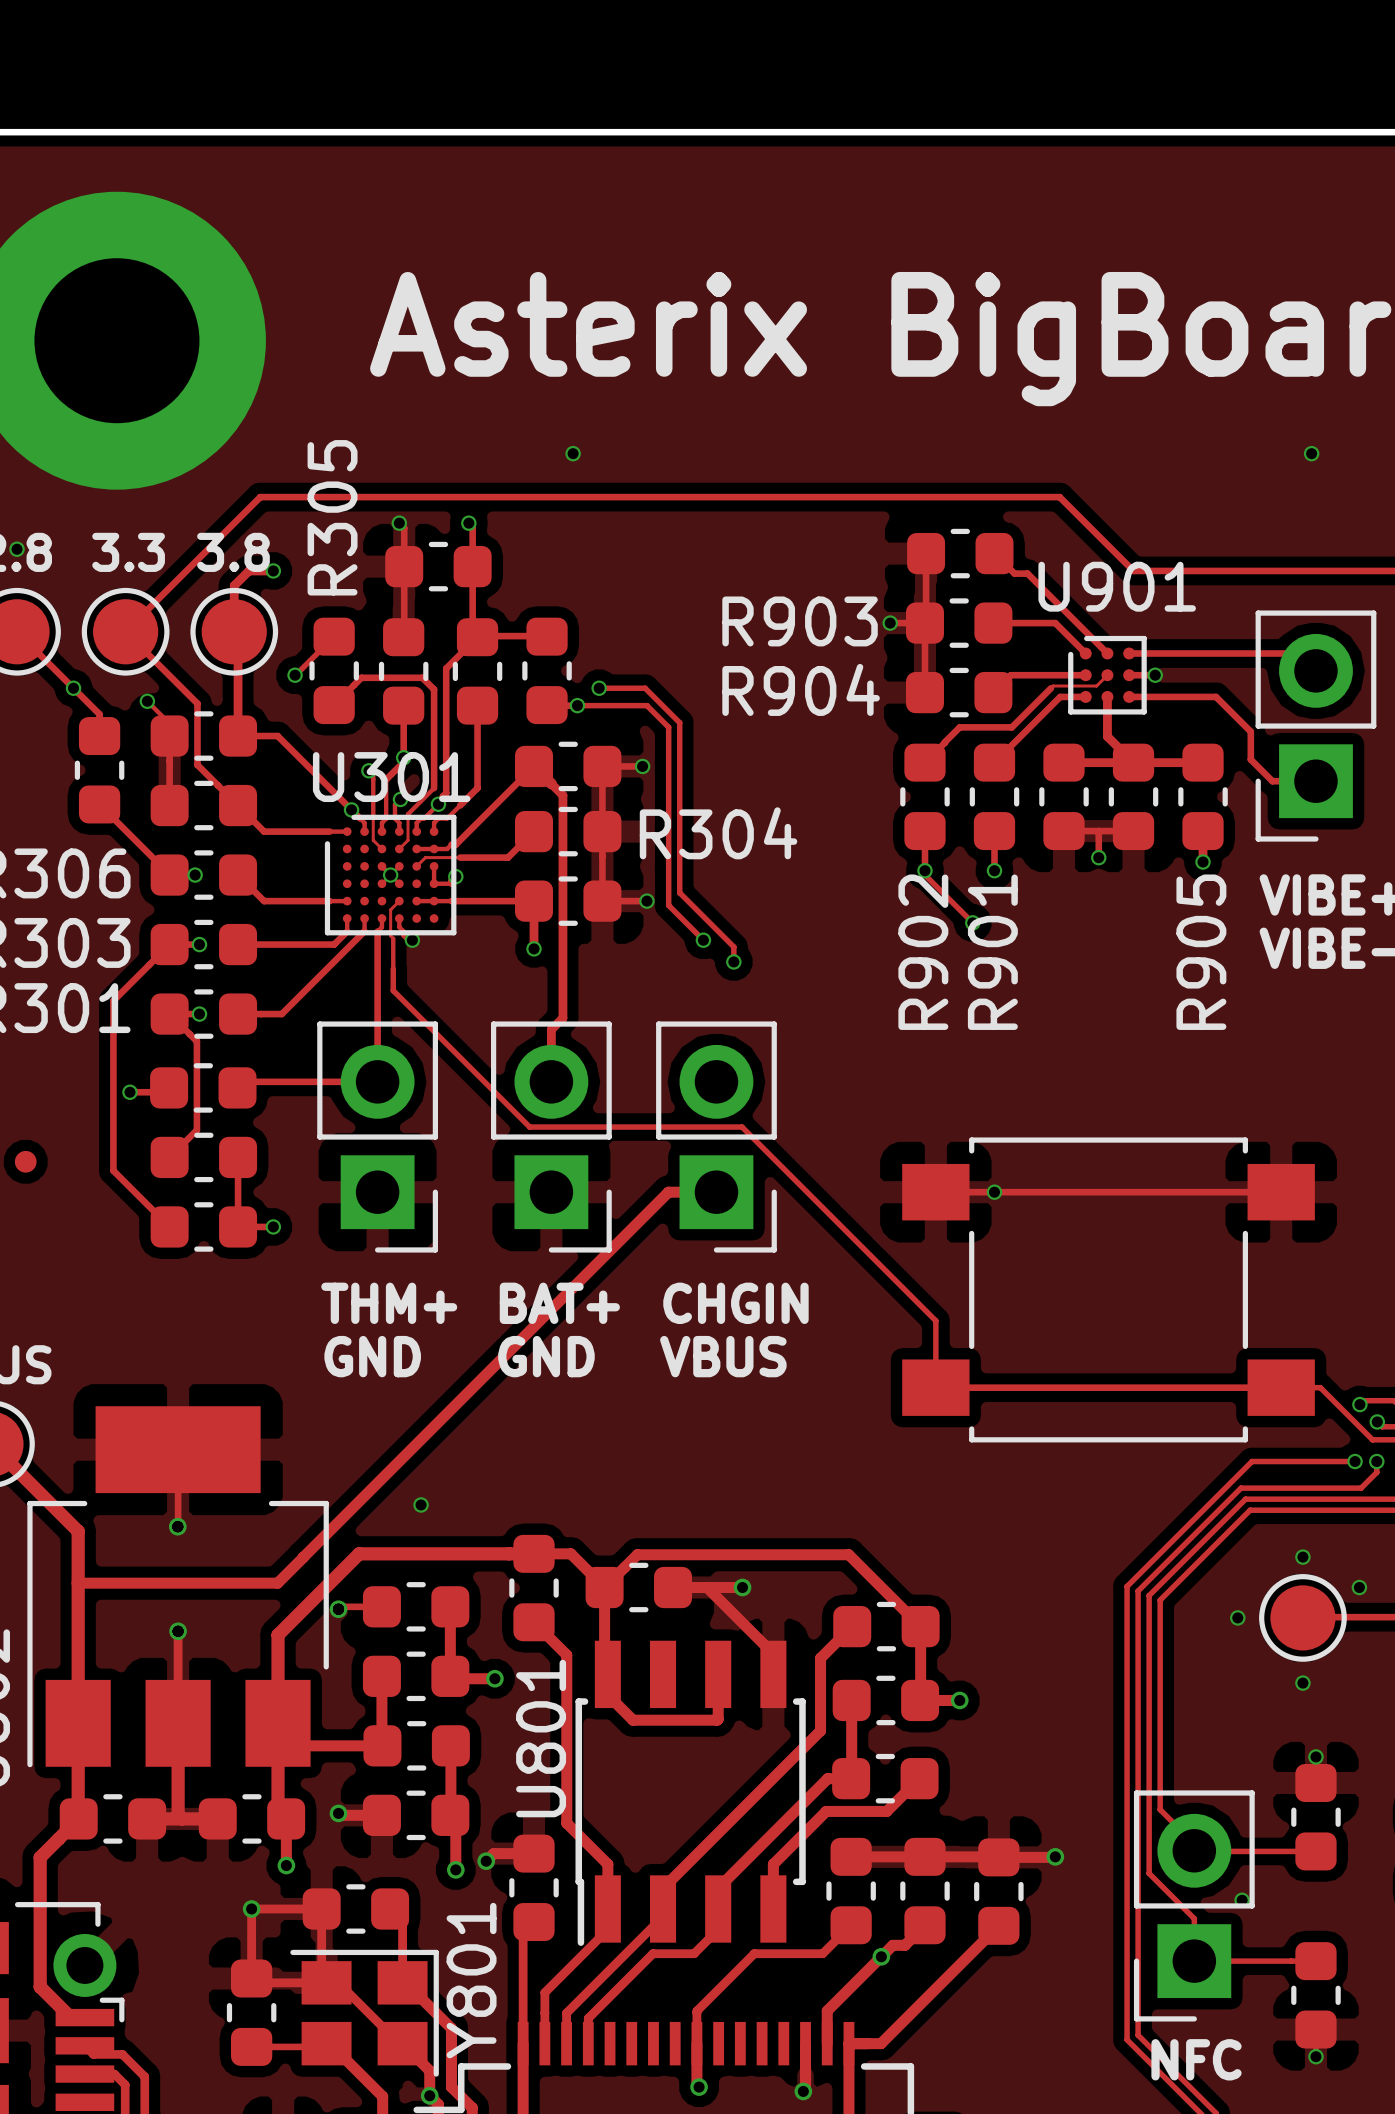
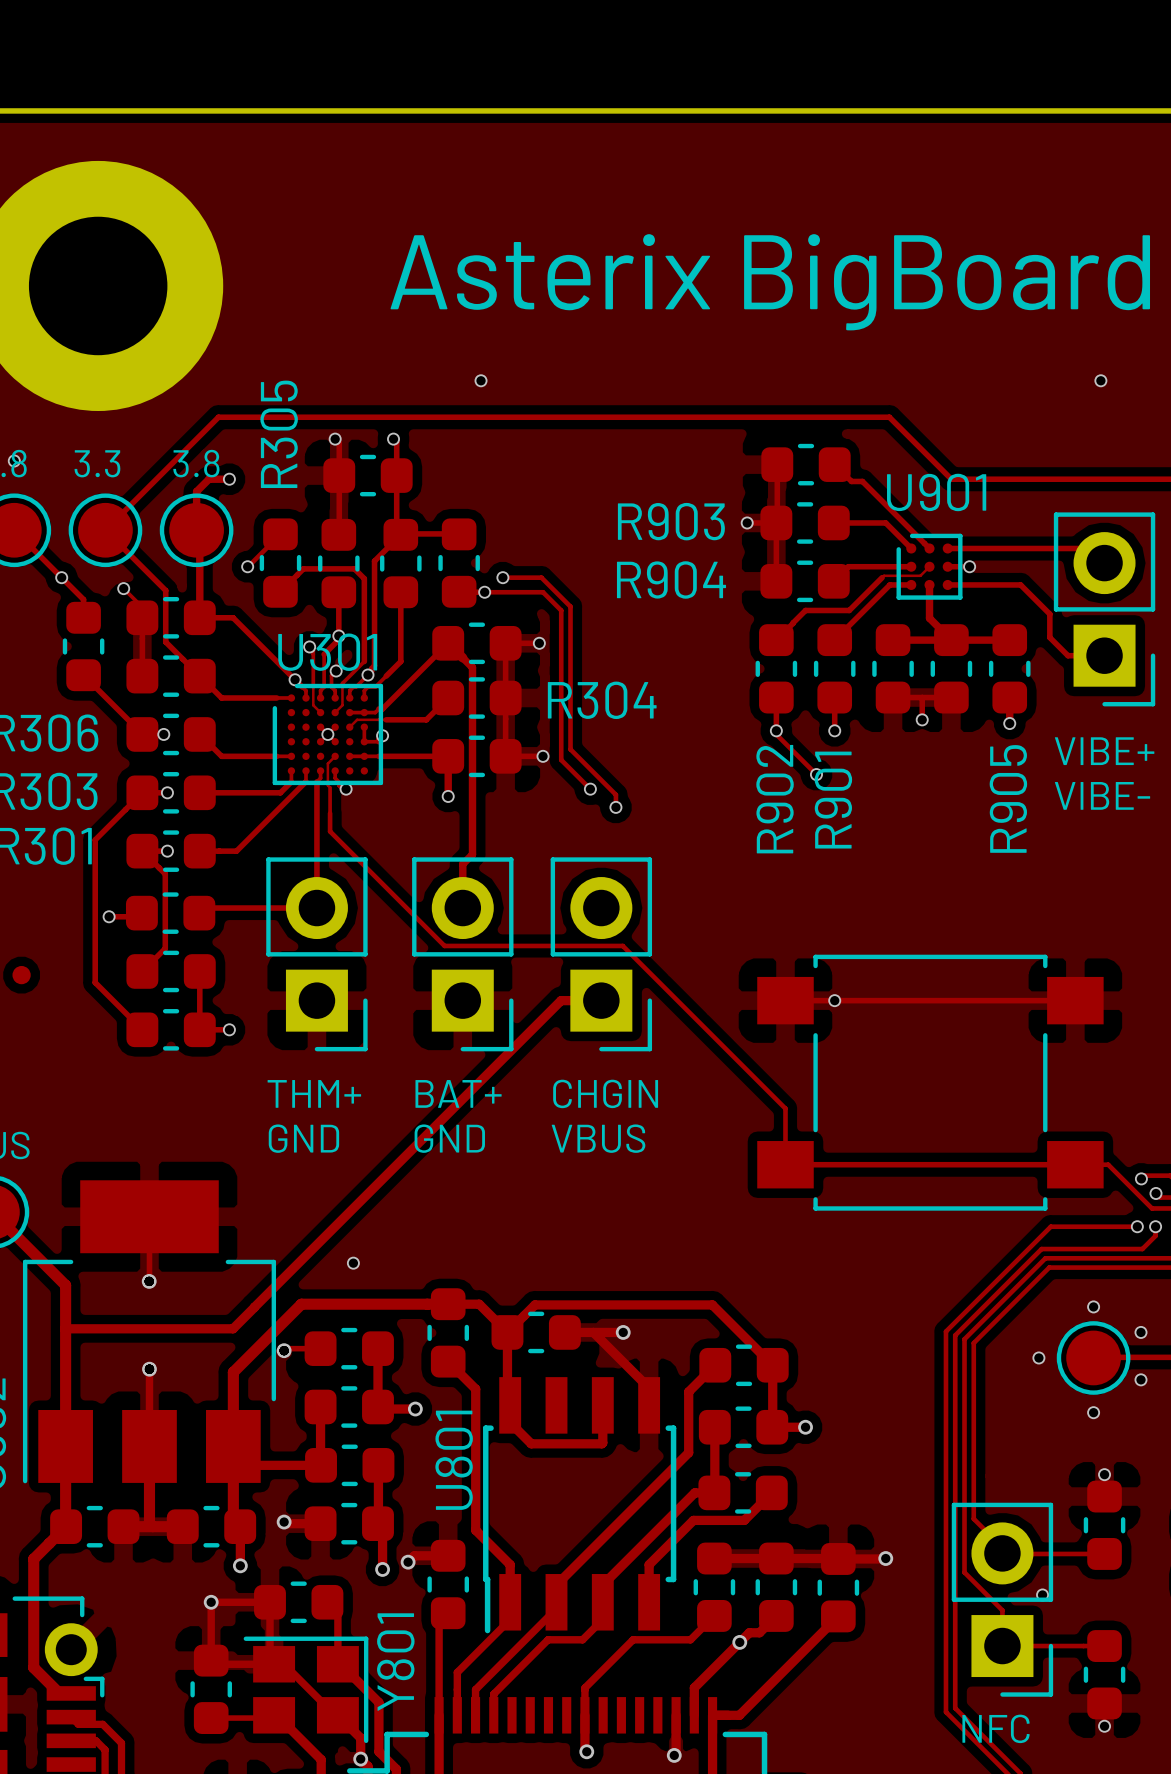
part footprint: [1255, 610, 1377, 842] -> [1053, 512, 1156, 707]
via: none -> (1141, 1379)
part footprint: [1133, 1790, 1255, 2022] -> [951, 1502, 1054, 1697]

